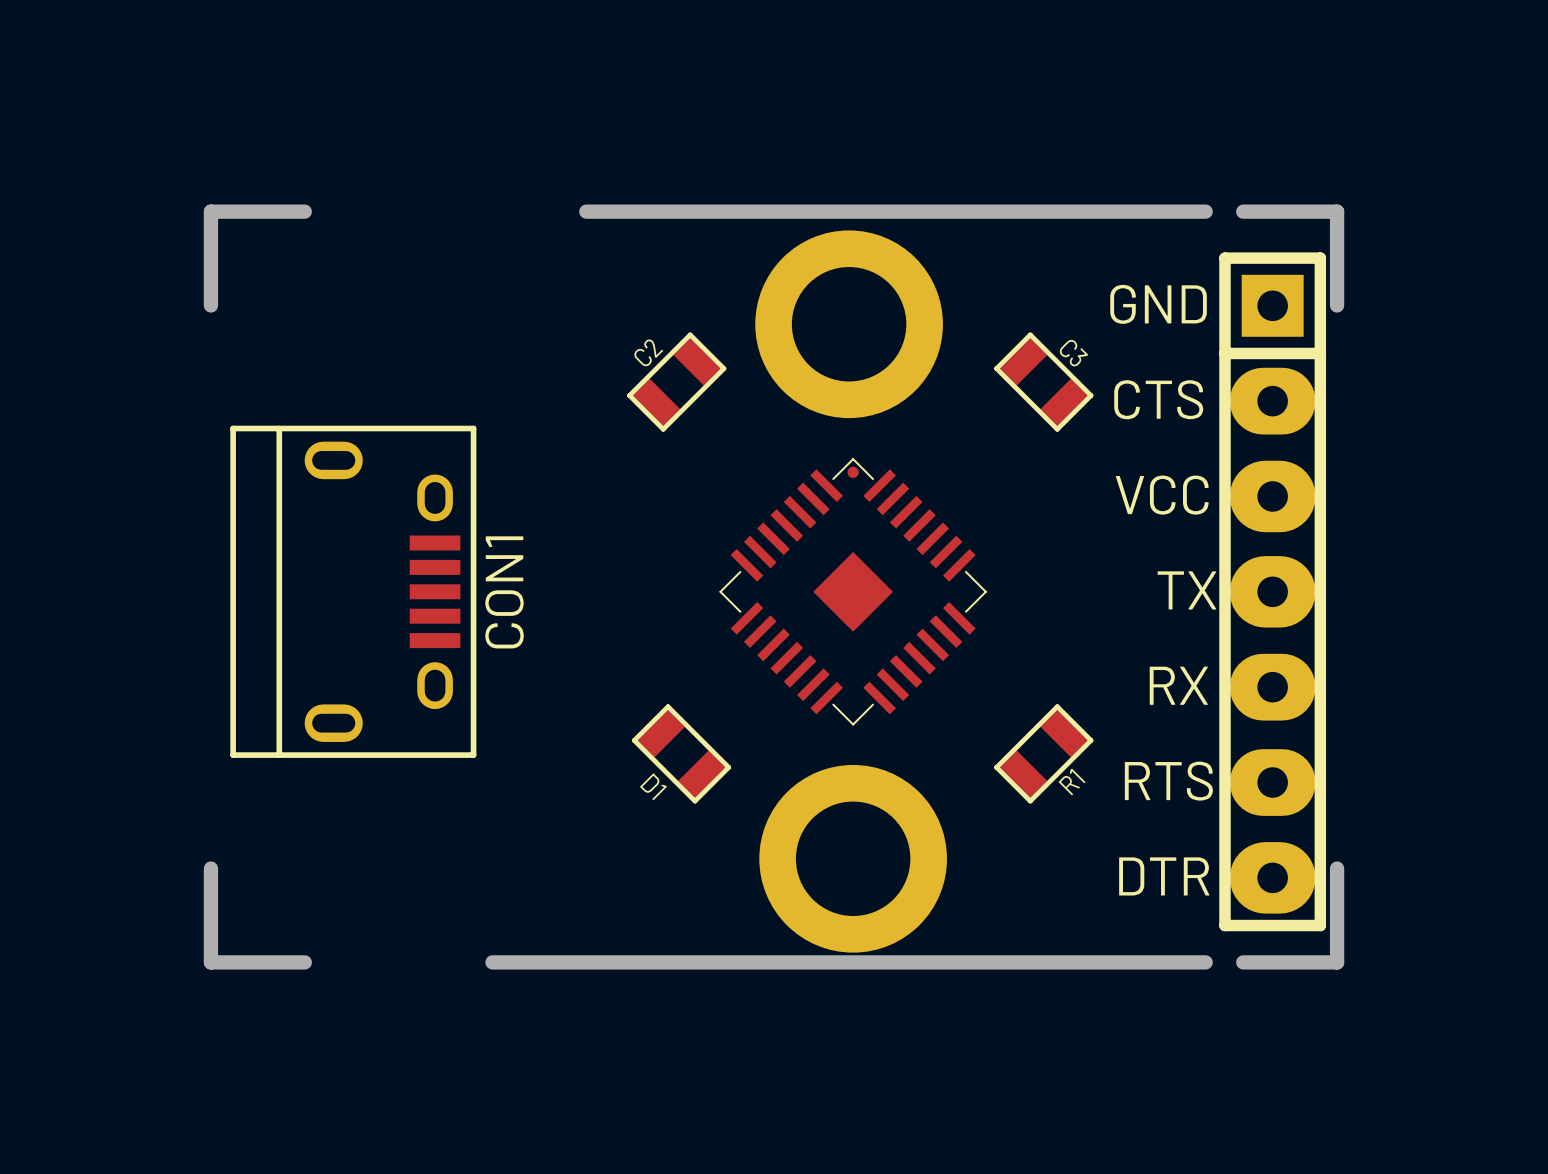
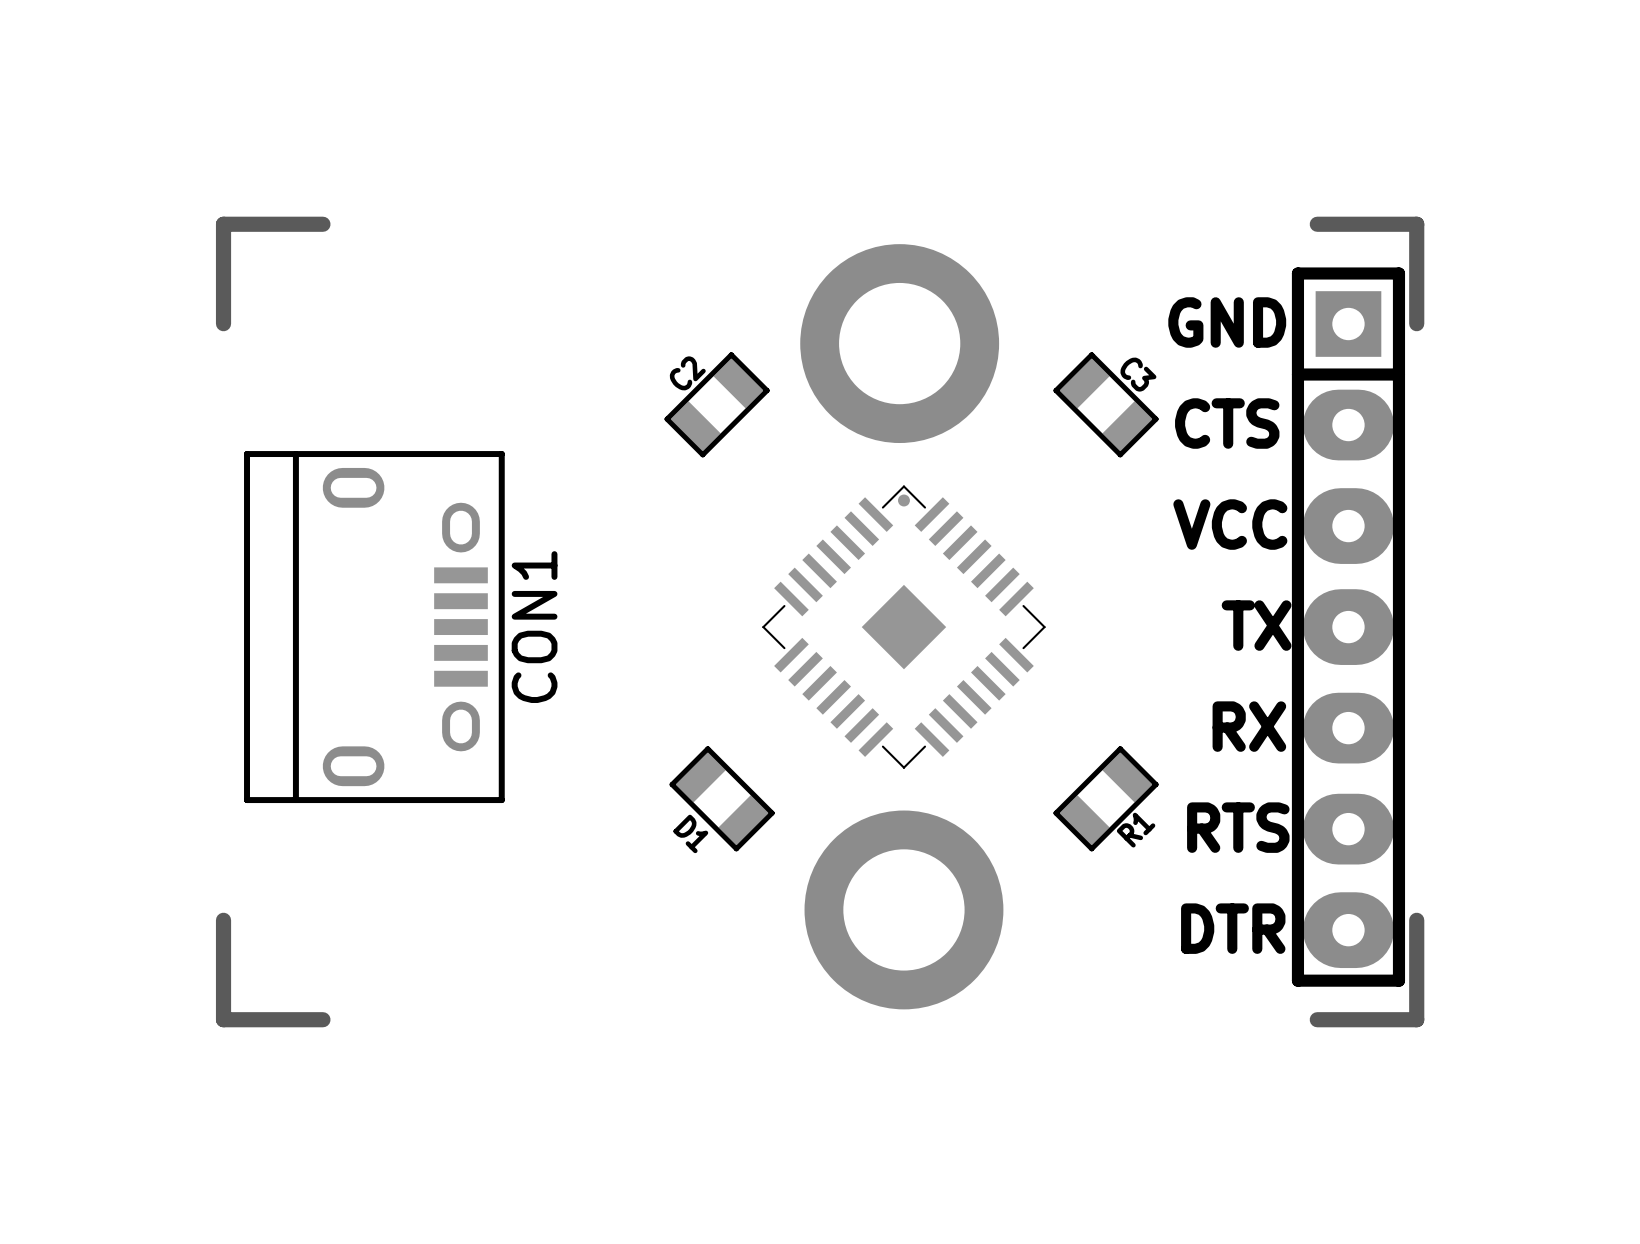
line: (586, 211) (1205, 211) -> none
line: (492, 962) (1205, 962) -> none

